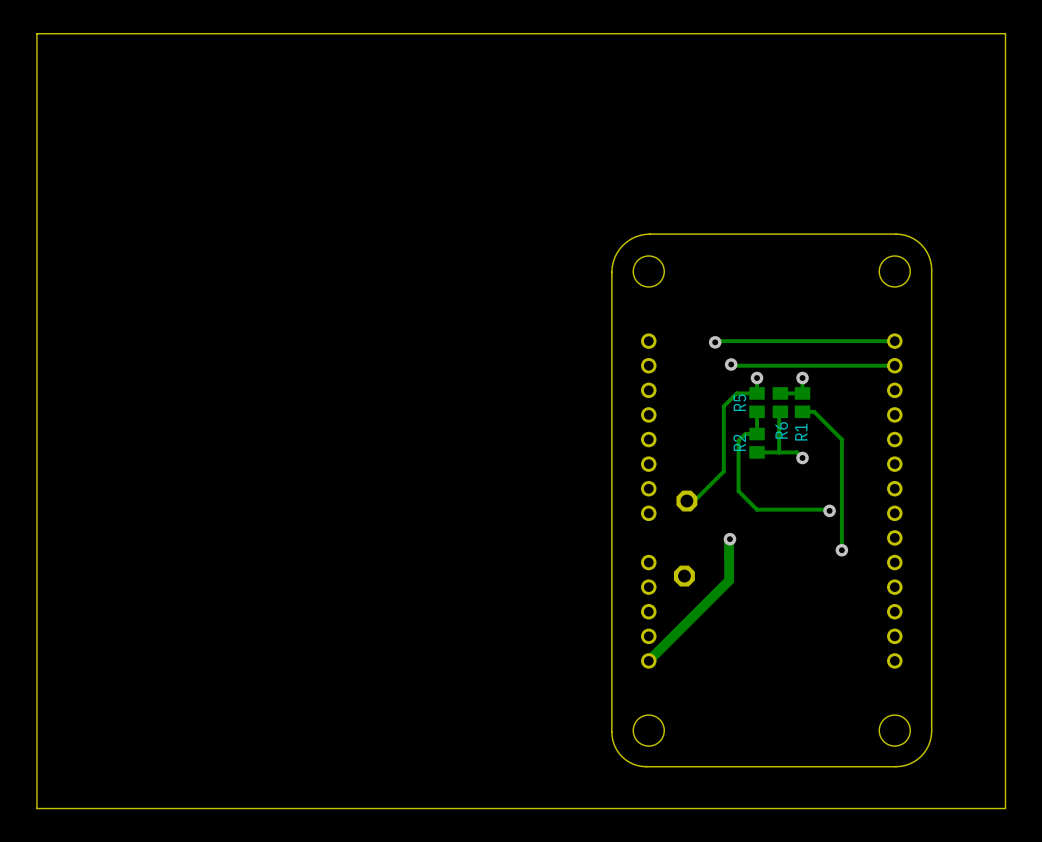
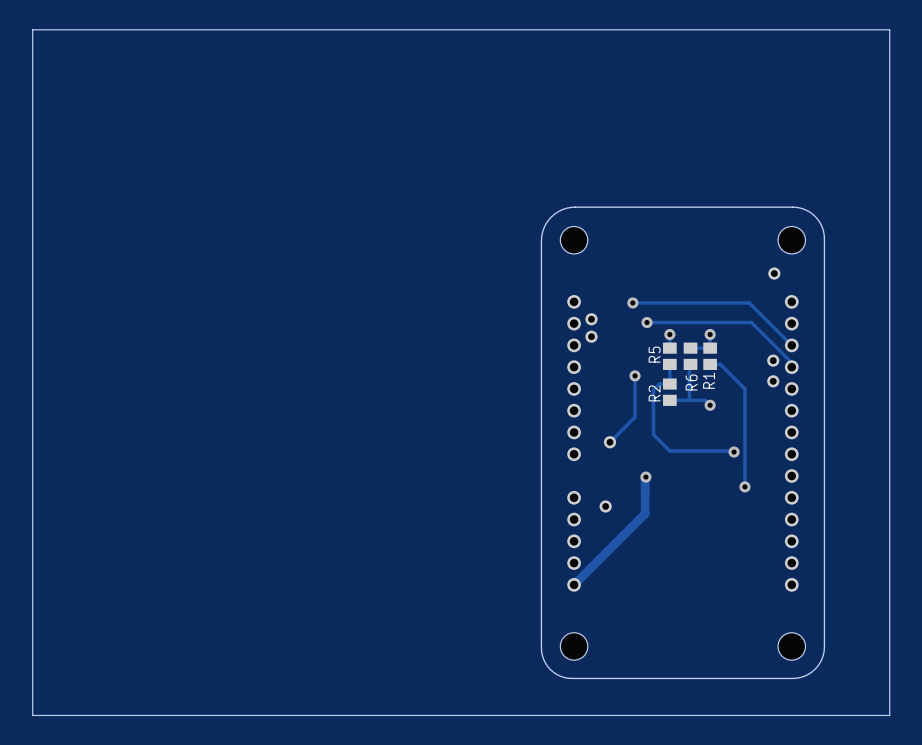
part: none -> (774, 273)
track: (894, 341) (715, 342) -> (791, 345) (749, 302) (632, 302)
part: none -> (591, 319)
track: (731, 364) (894, 365) -> (647, 322) (751, 322) (791, 362) (791, 367)
part: none -> (591, 336)
track: (757, 393) (736, 393) (723, 406) (723, 471) (694, 501) (686, 501) -> none
part: none -> (773, 360)
track: none -> (635, 375) (635, 417) (610, 442)
via: none -> (635, 375)
part: none -> (773, 381)
part footprint: [676, 490, 698, 512] -> [603, 436, 617, 449]
part footprint: [673, 565, 695, 587] -> [599, 500, 612, 513]

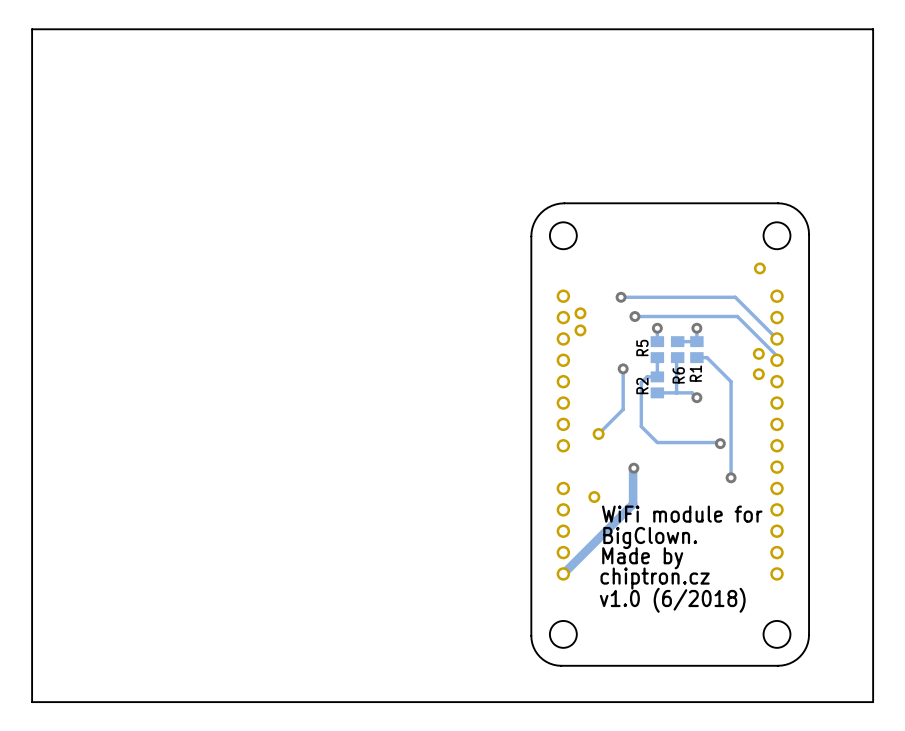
text: none -> WiFi module for (682, 514)
text: none -> BigClown. (650, 537)
text: none -> Made by (642, 558)
text: none -> chiptron.cz (655, 578)
text: none -> v1.0 (6/2018) (672, 600)

